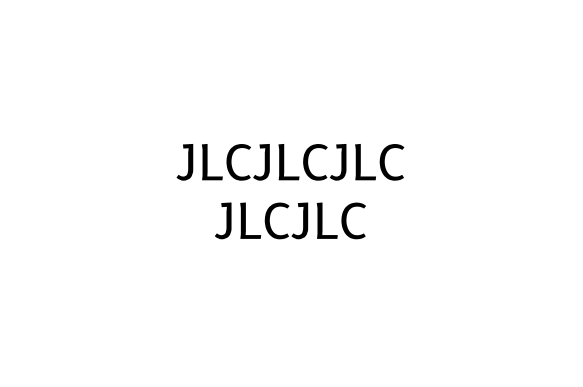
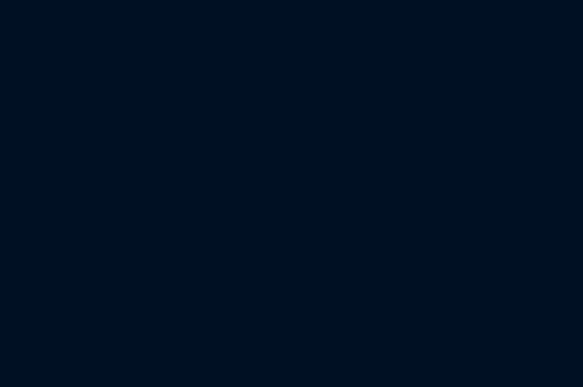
text: JLCJLCJLC (290, 162) -> none
text: JLCJLC (290, 220) -> none

